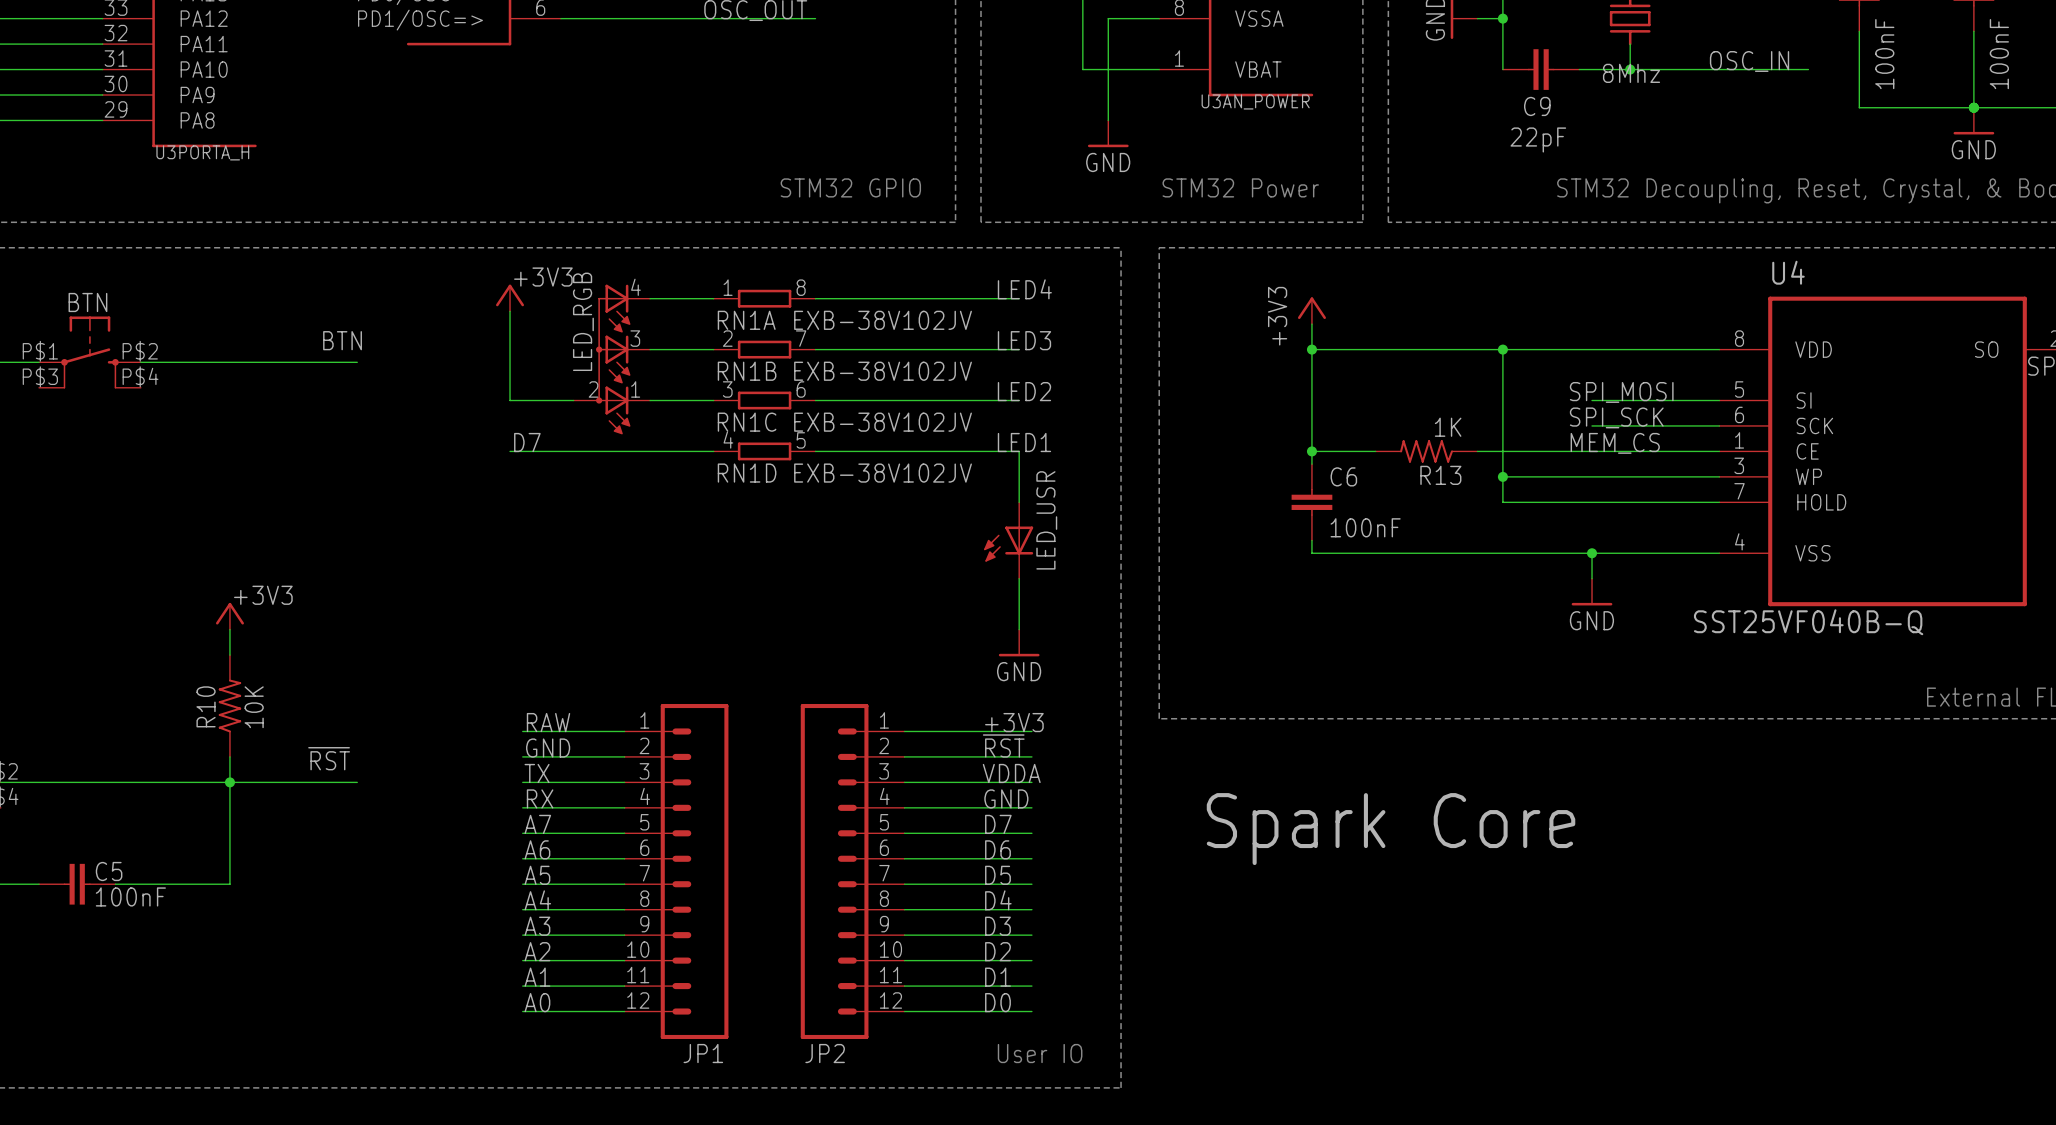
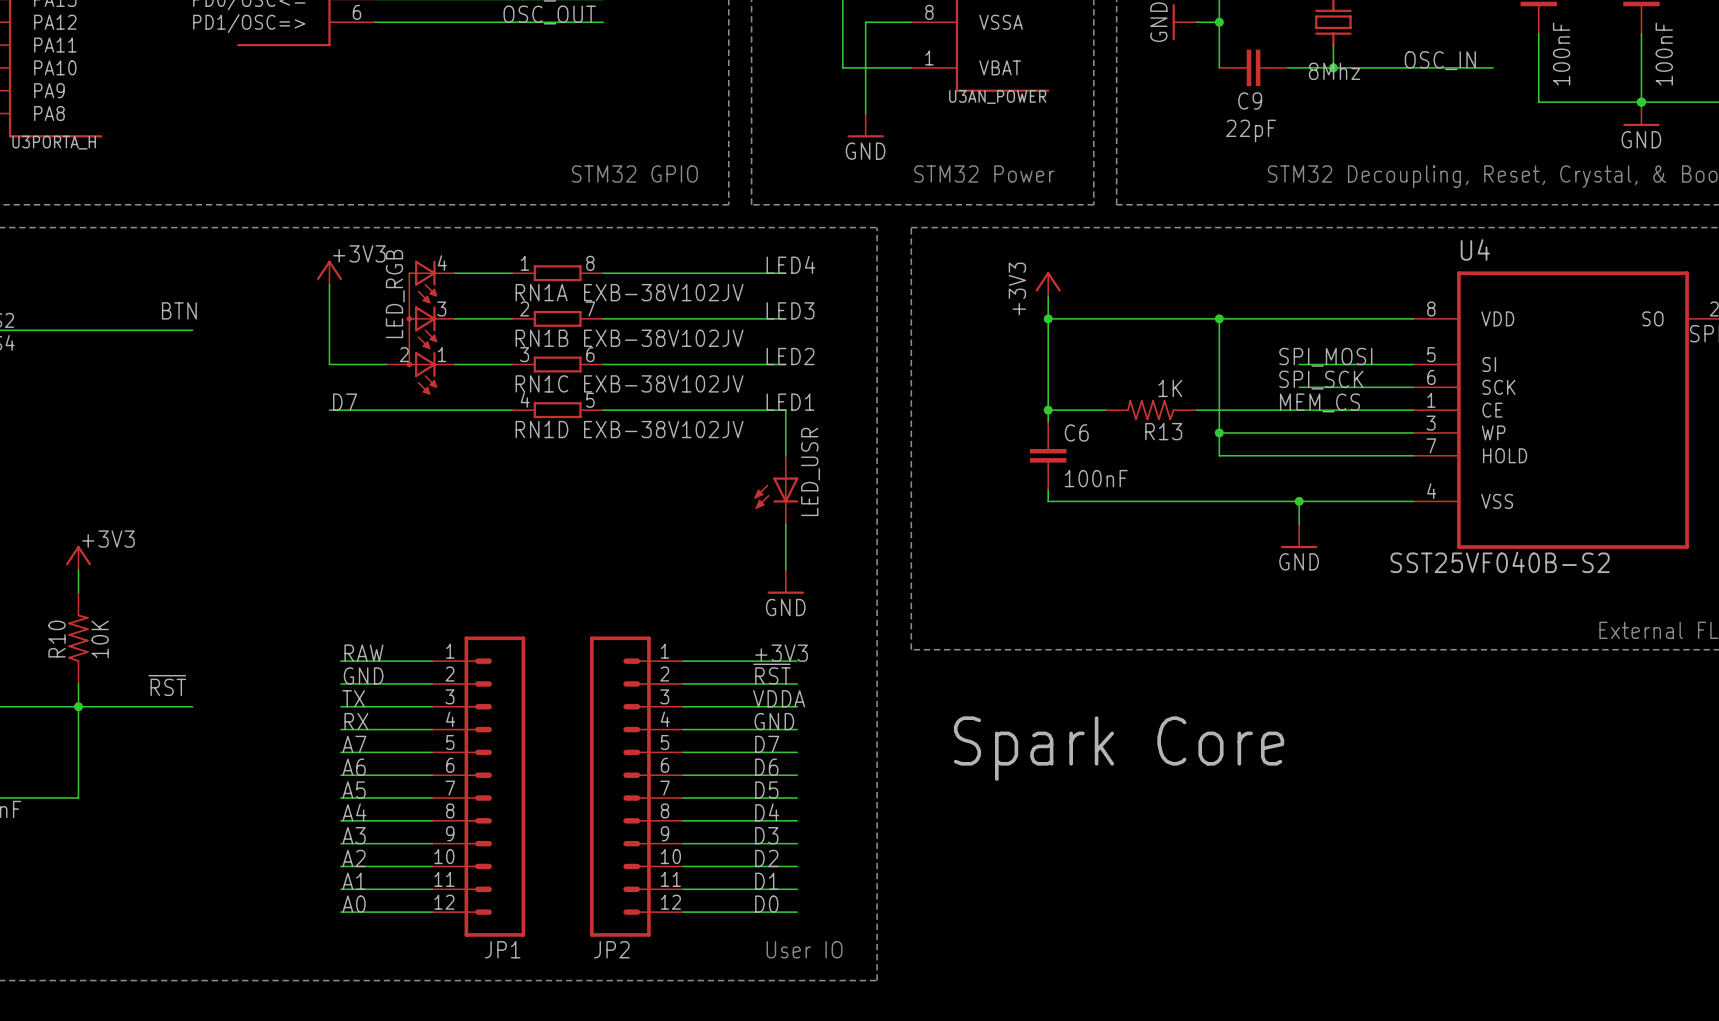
U4 value: SST25VF040B-Q (1808, 622) -> SST25VF040B-S2 (1500, 562)

